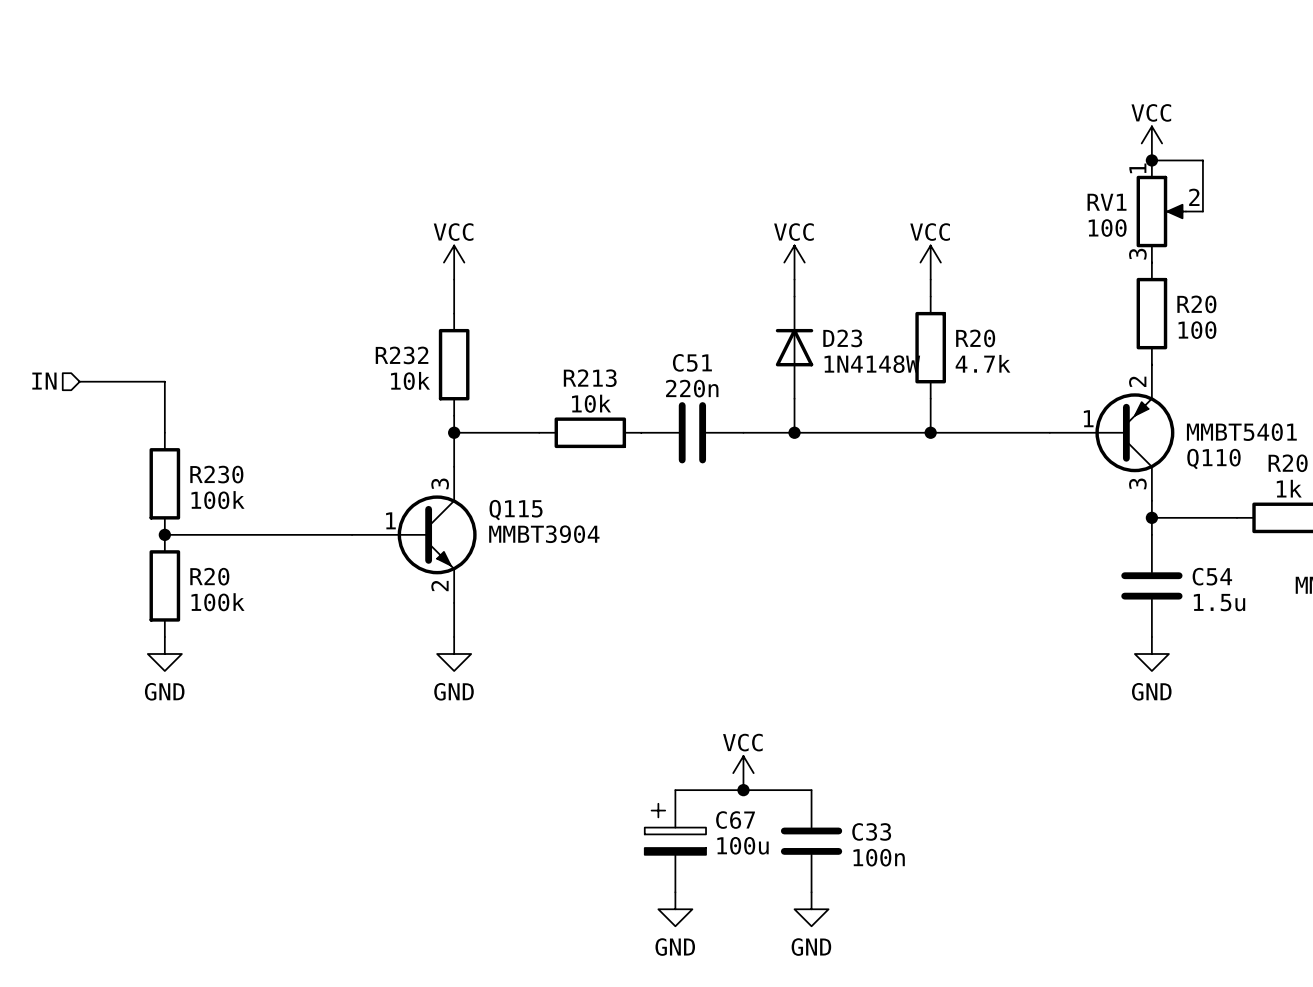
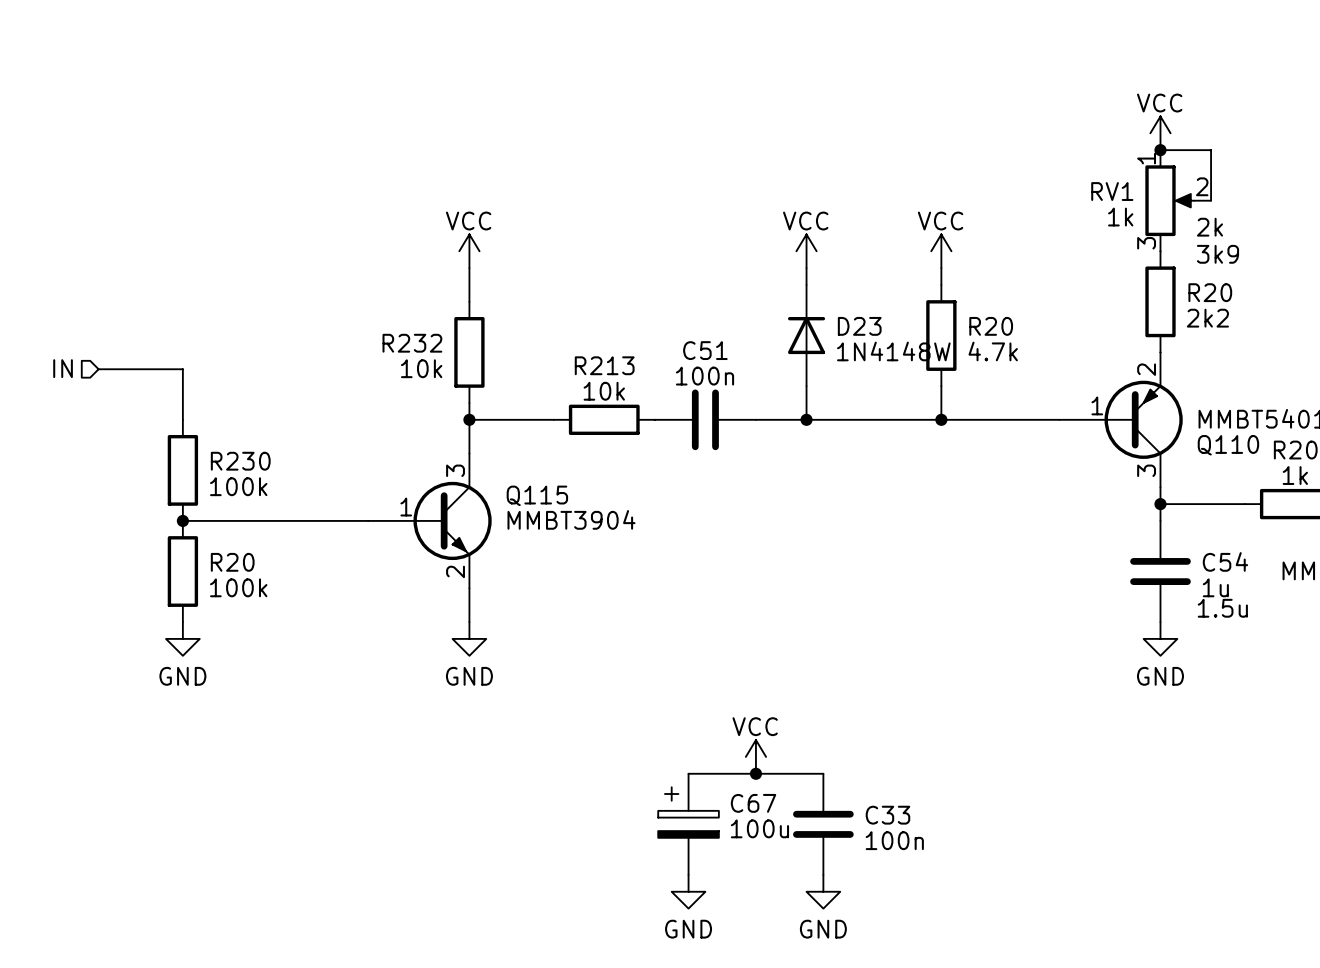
RV1 value: 100 (1107, 228) -> 1k (1120, 217)
text: none -> 2k (1209, 227)
text: none -> 3k9 (1218, 254)
R20 value: 100 (1197, 330) -> 2k2 (1207, 318)
C51 value: 220n (692, 388) -> 100n (705, 376)
C54 value: 1.5u (1219, 602) -> 1u (1215, 587)
text: none -> 1.5u (1222, 608)

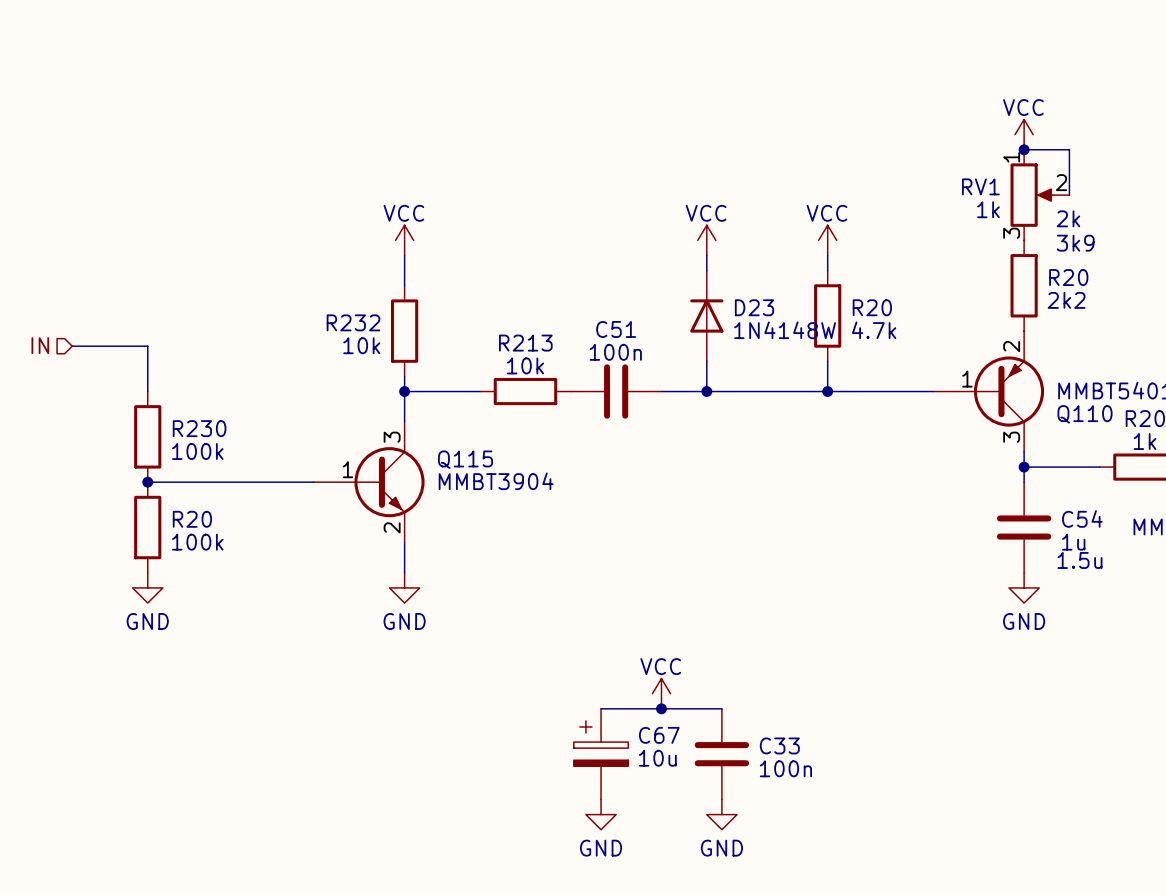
C67 value: 100u (759, 828) -> 10u (657, 758)

